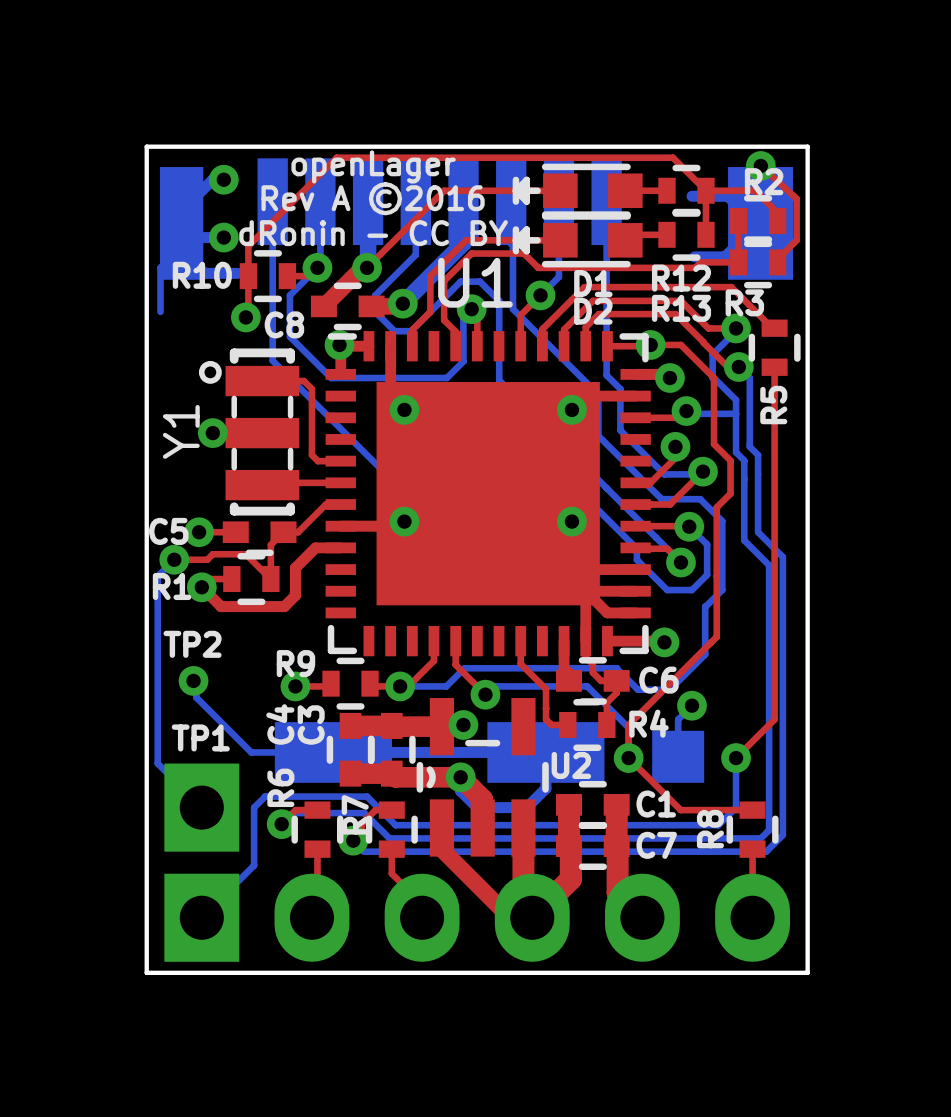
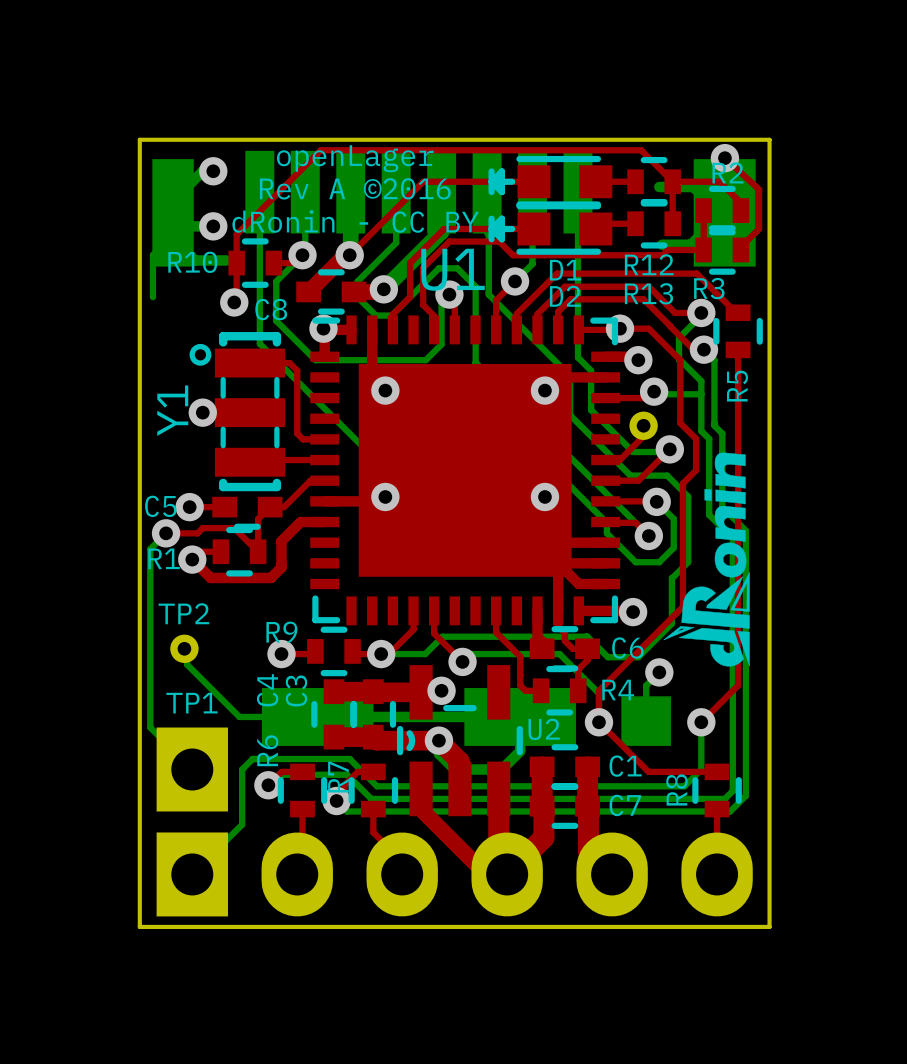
drawing: none -> [663, 452, 750, 667]

